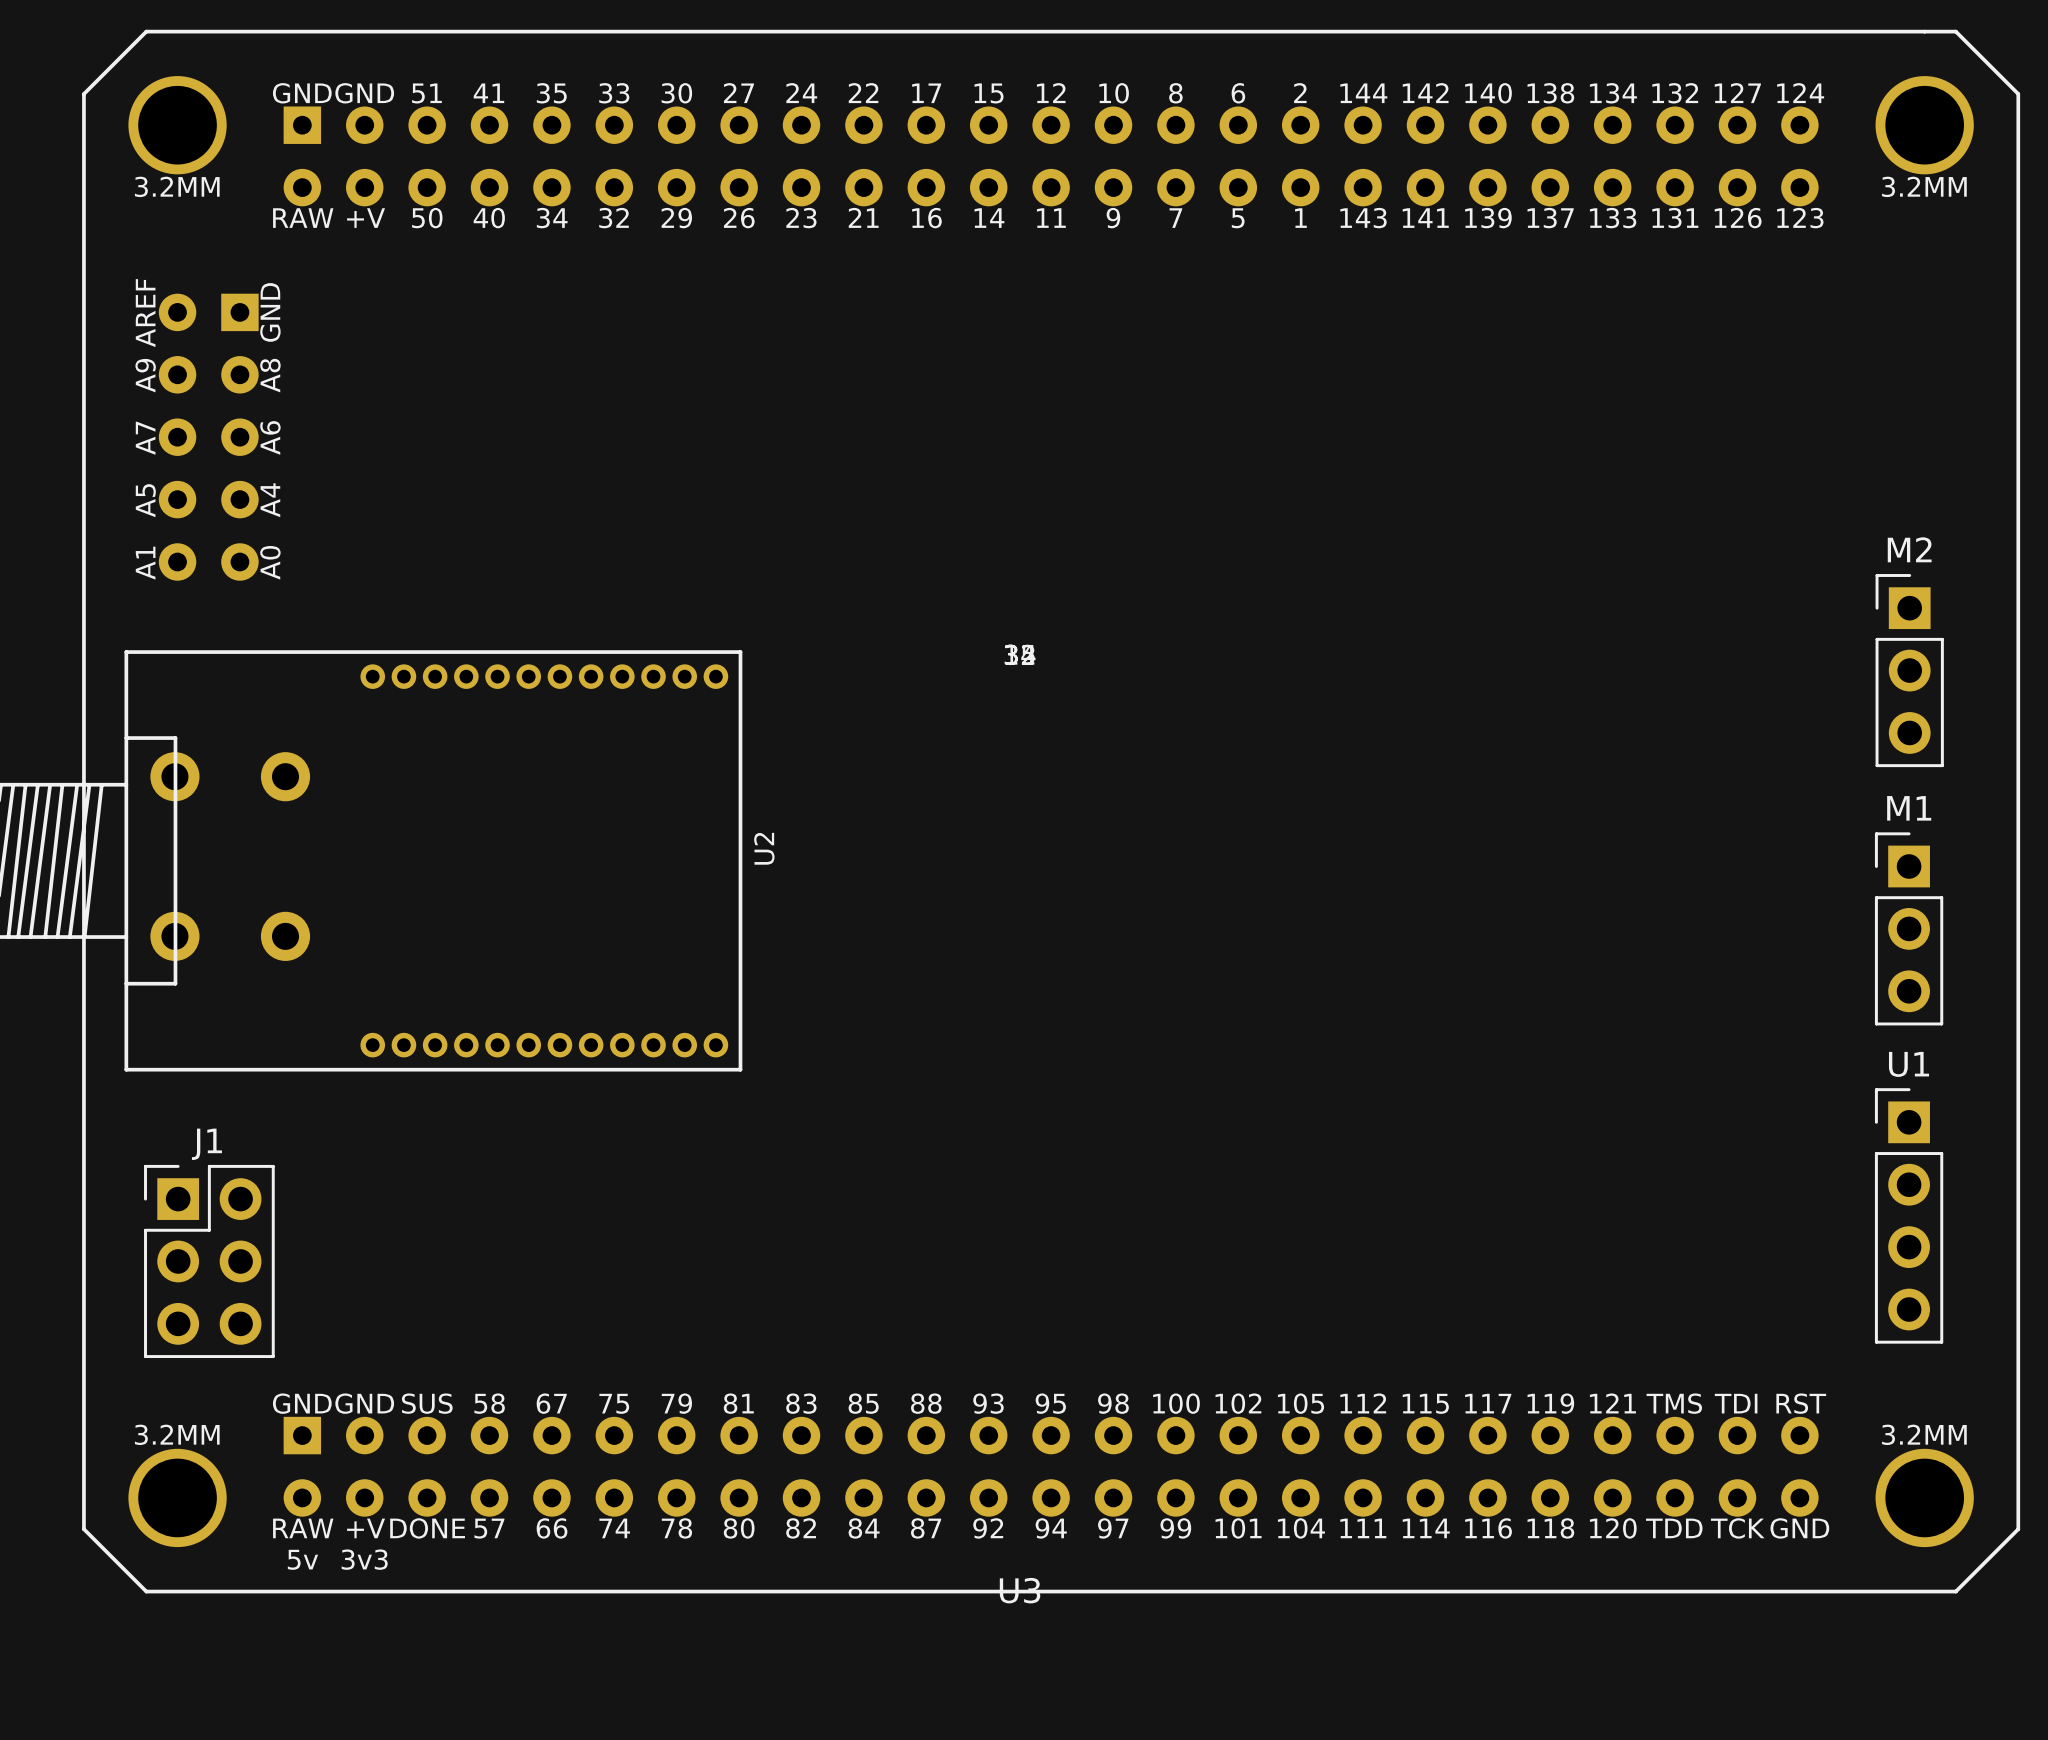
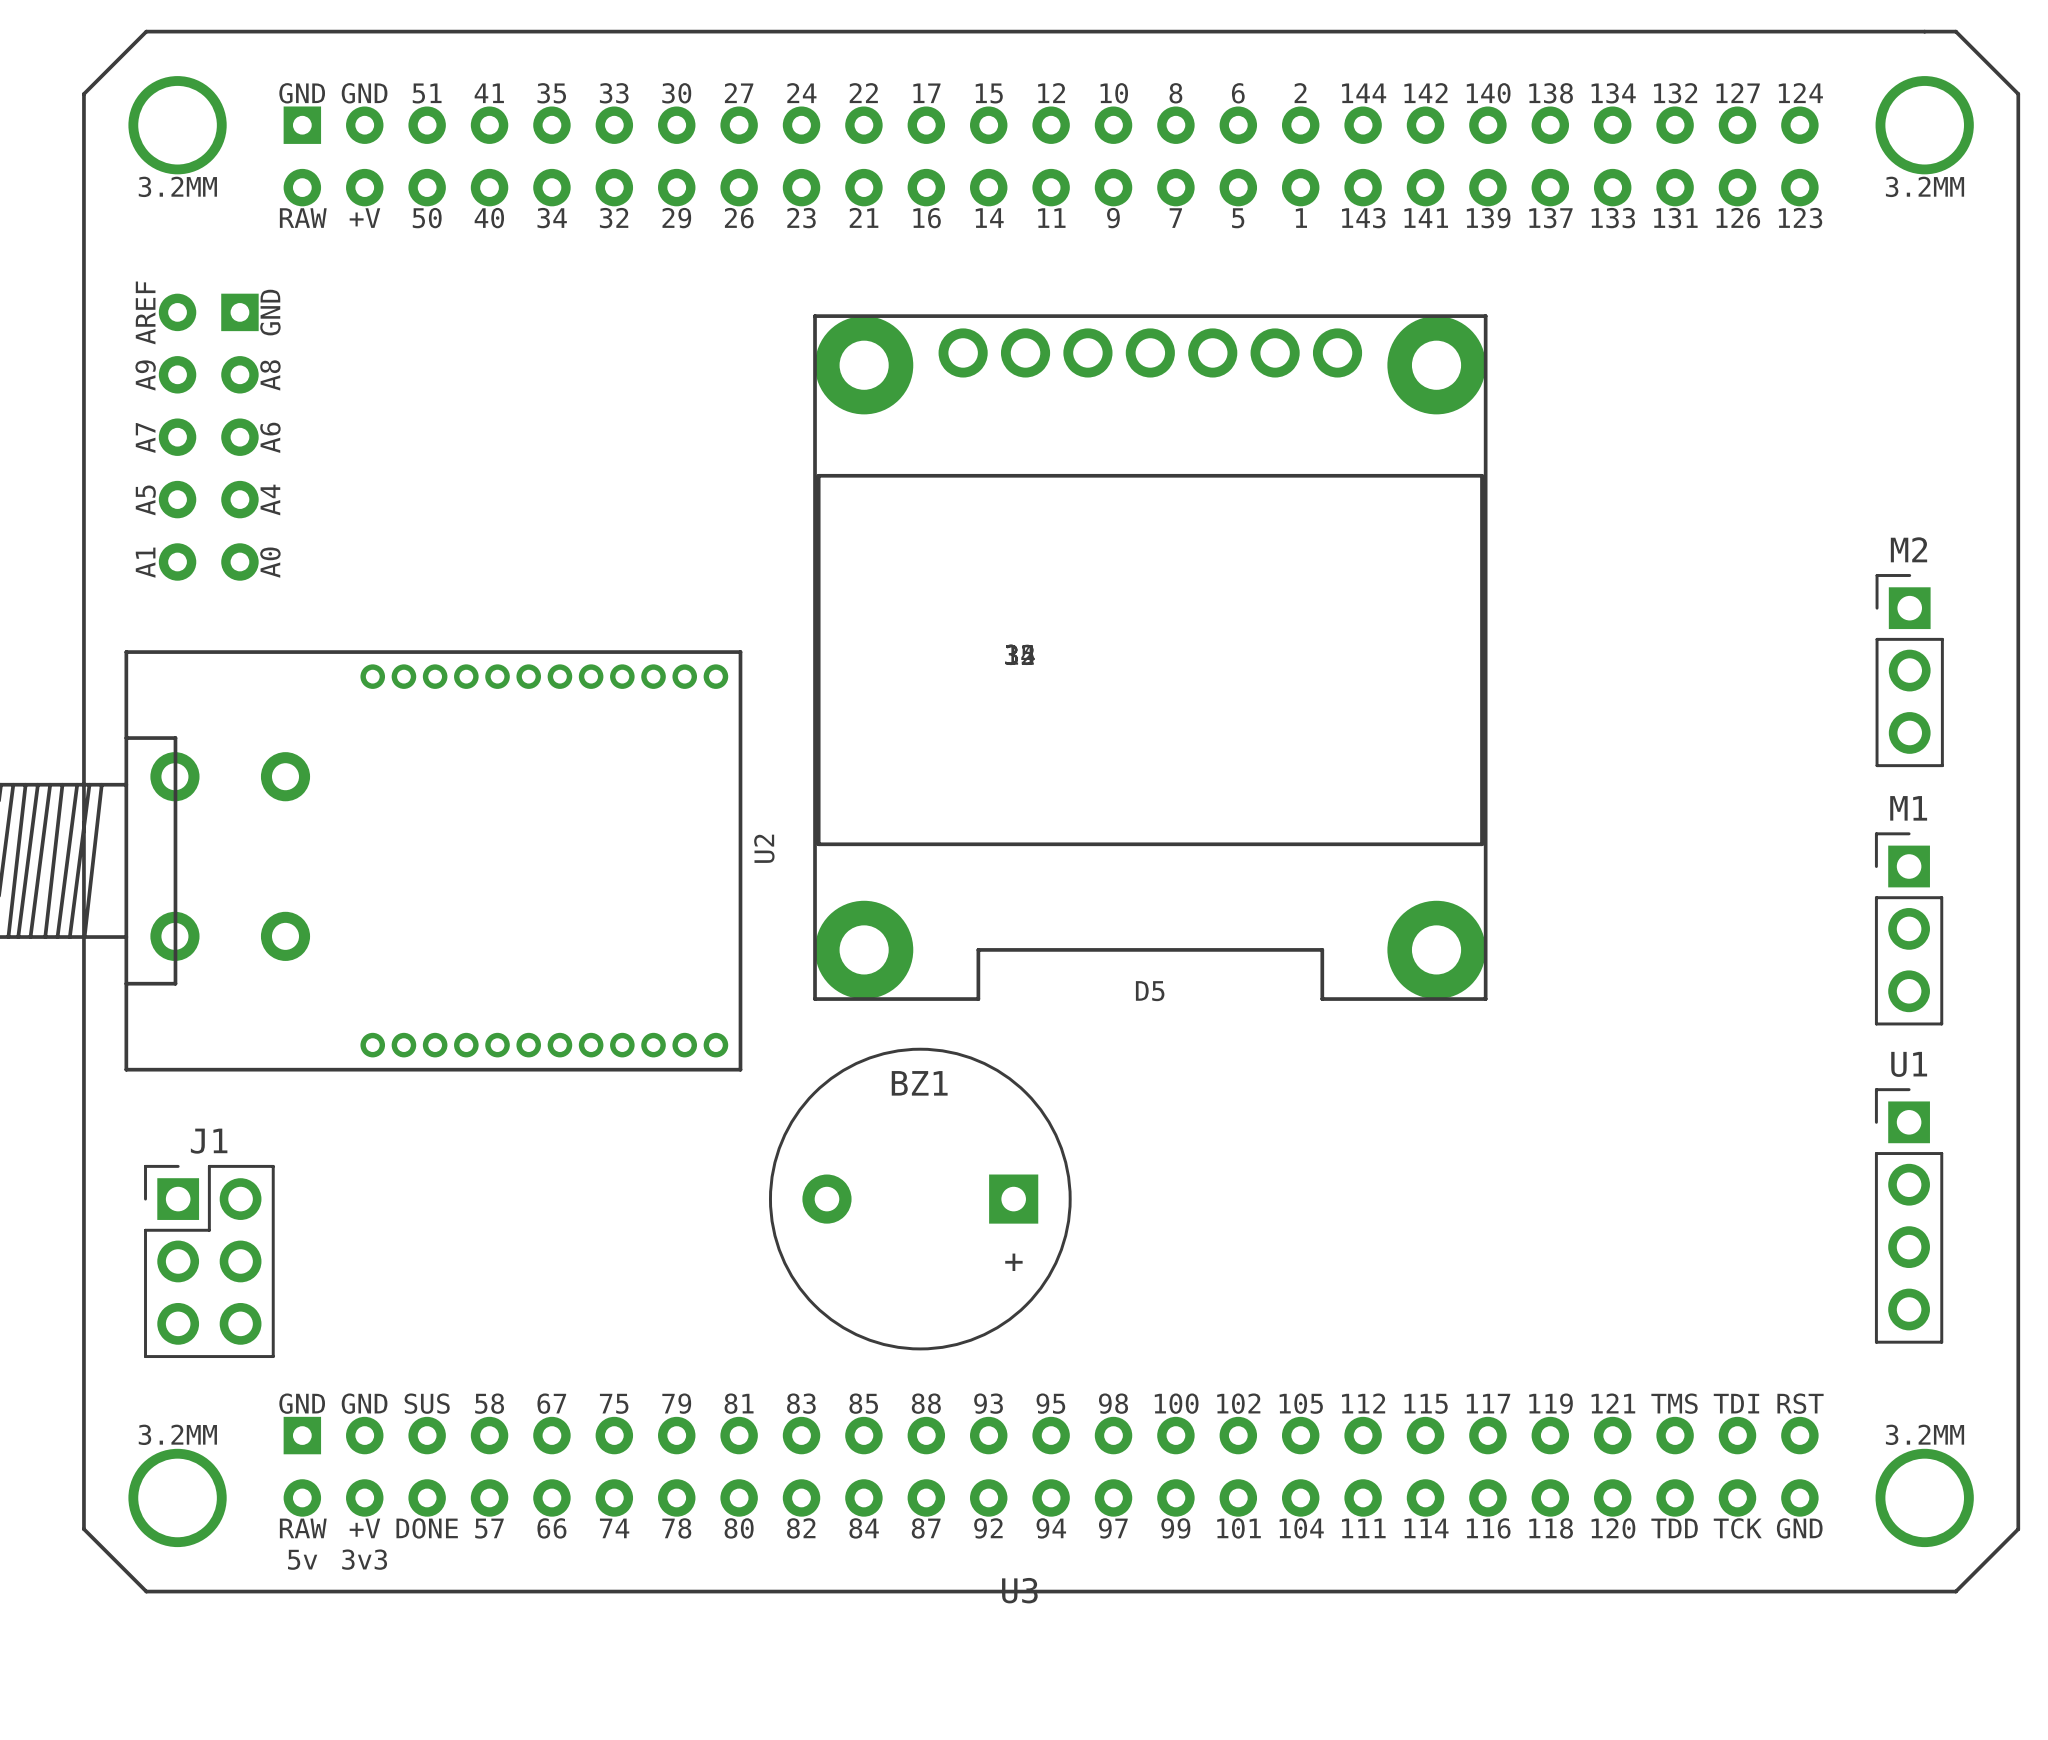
D5: none -> (1150, 657)
BZ1: none -> (920, 1199)

